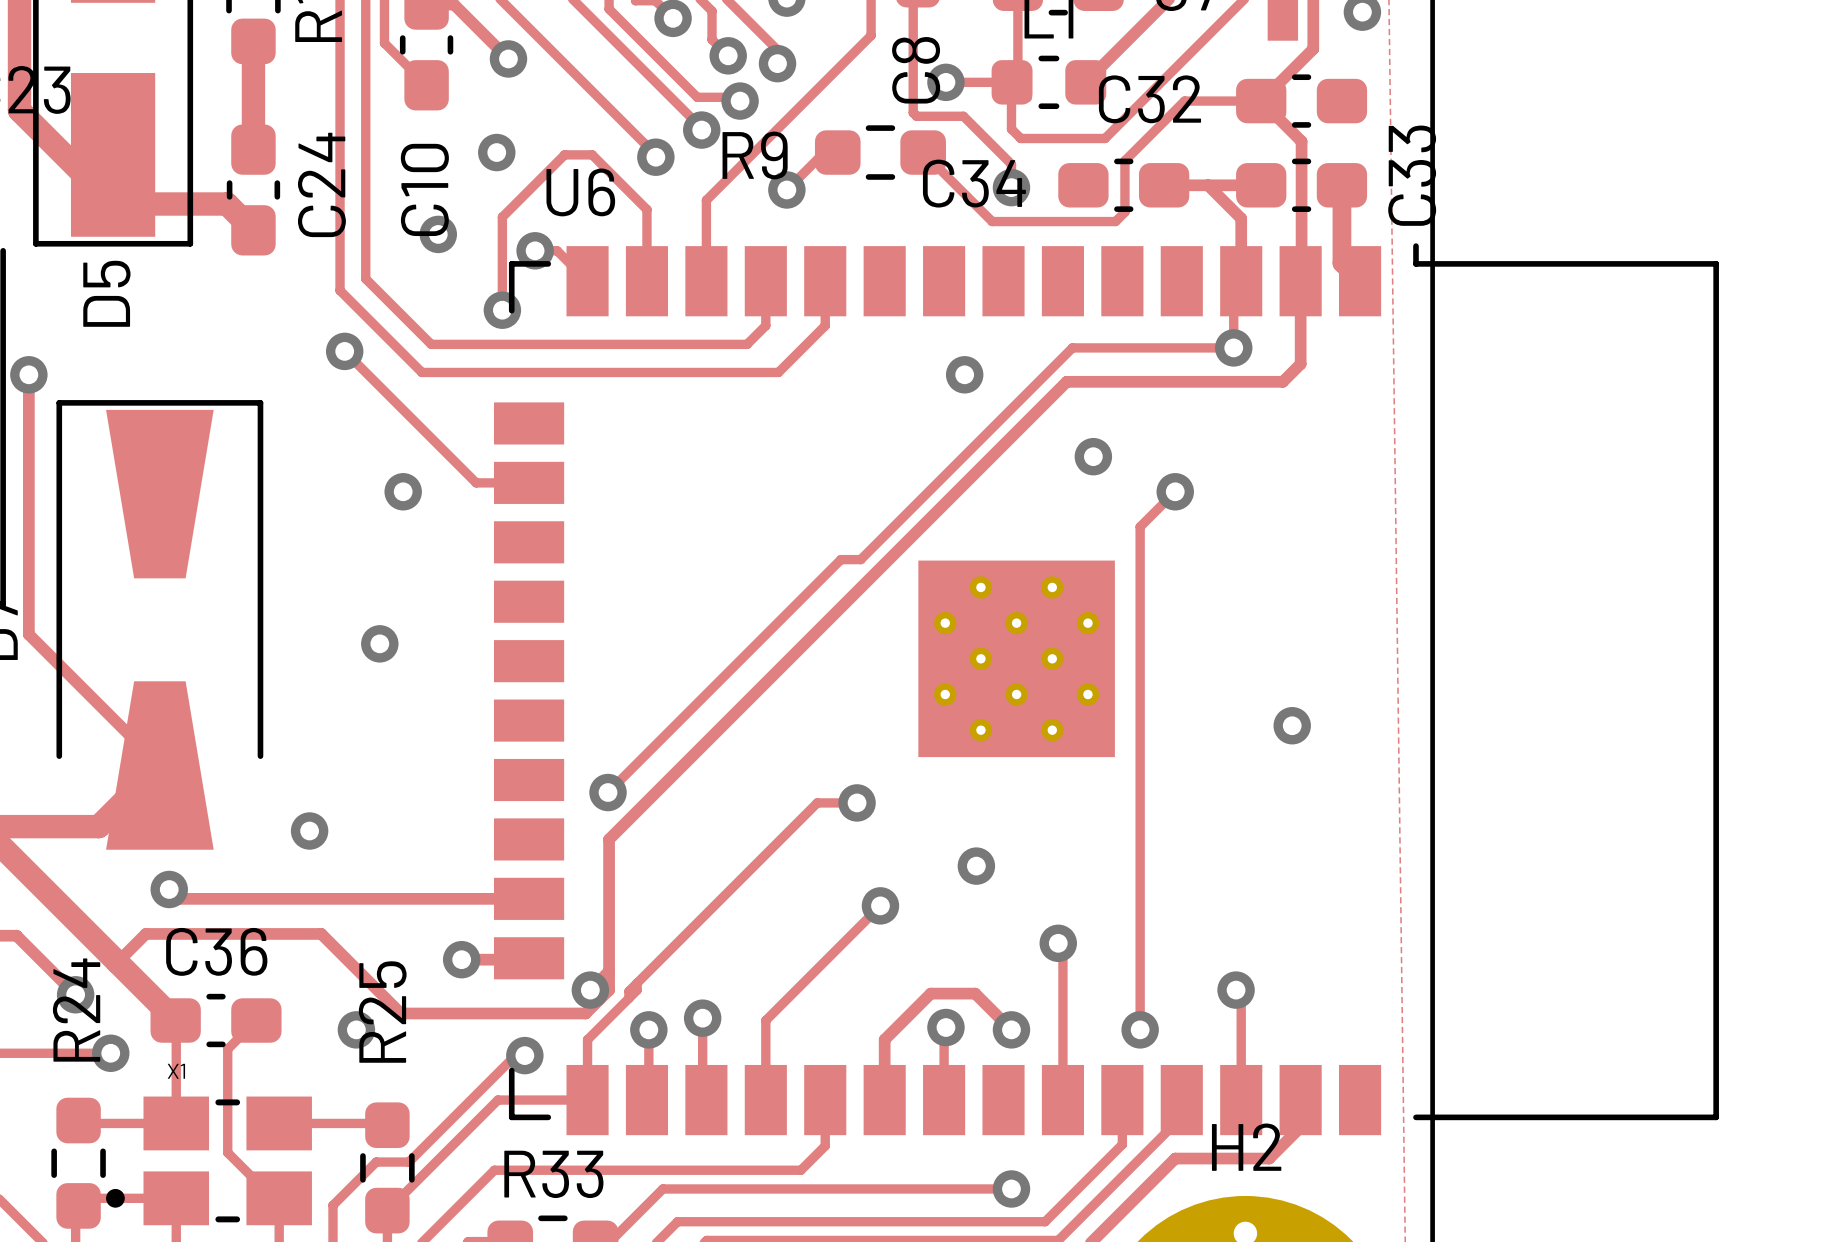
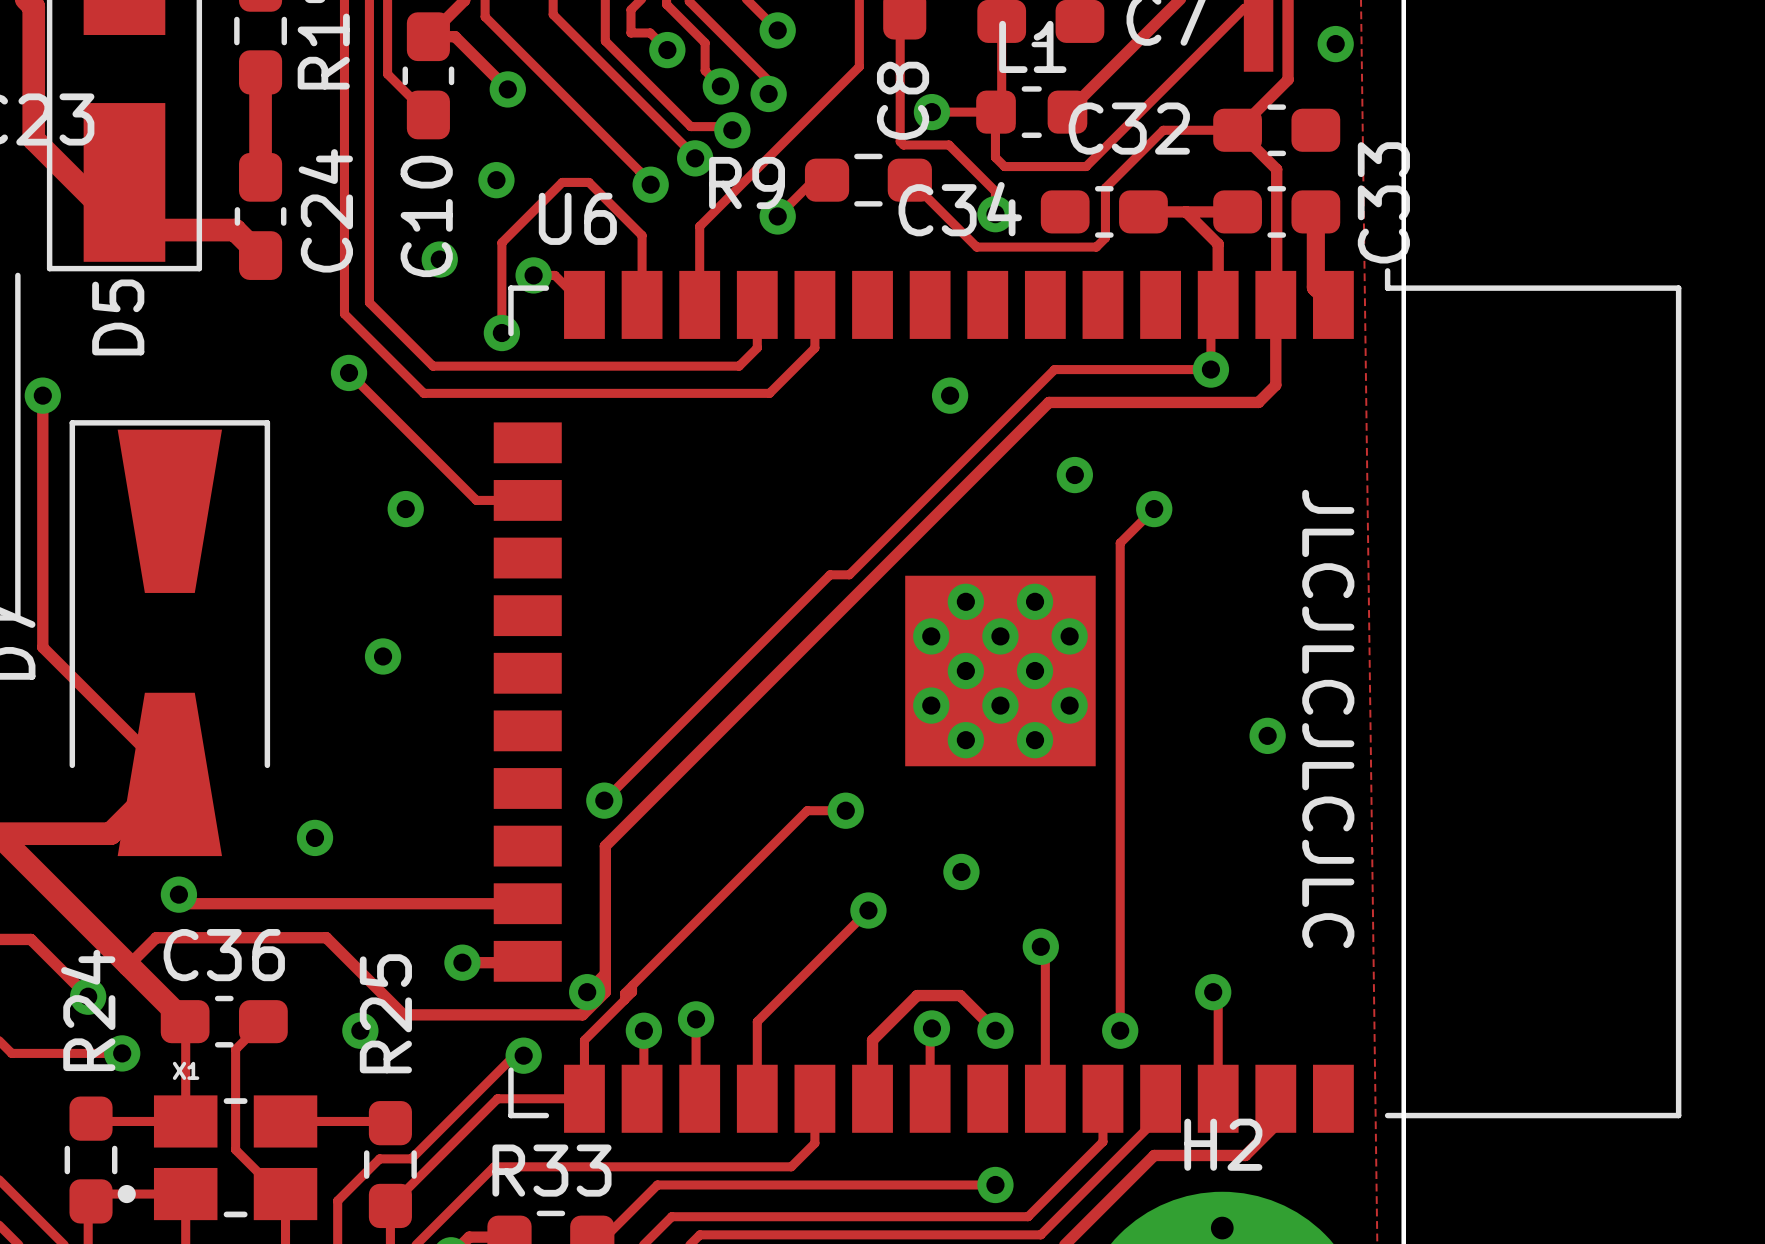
U6 footprint: [493, 243, 1719, 1136] -> [493, 268, 1682, 1133]
text: none -> JLCJLCJLCJLC (1328, 718)

